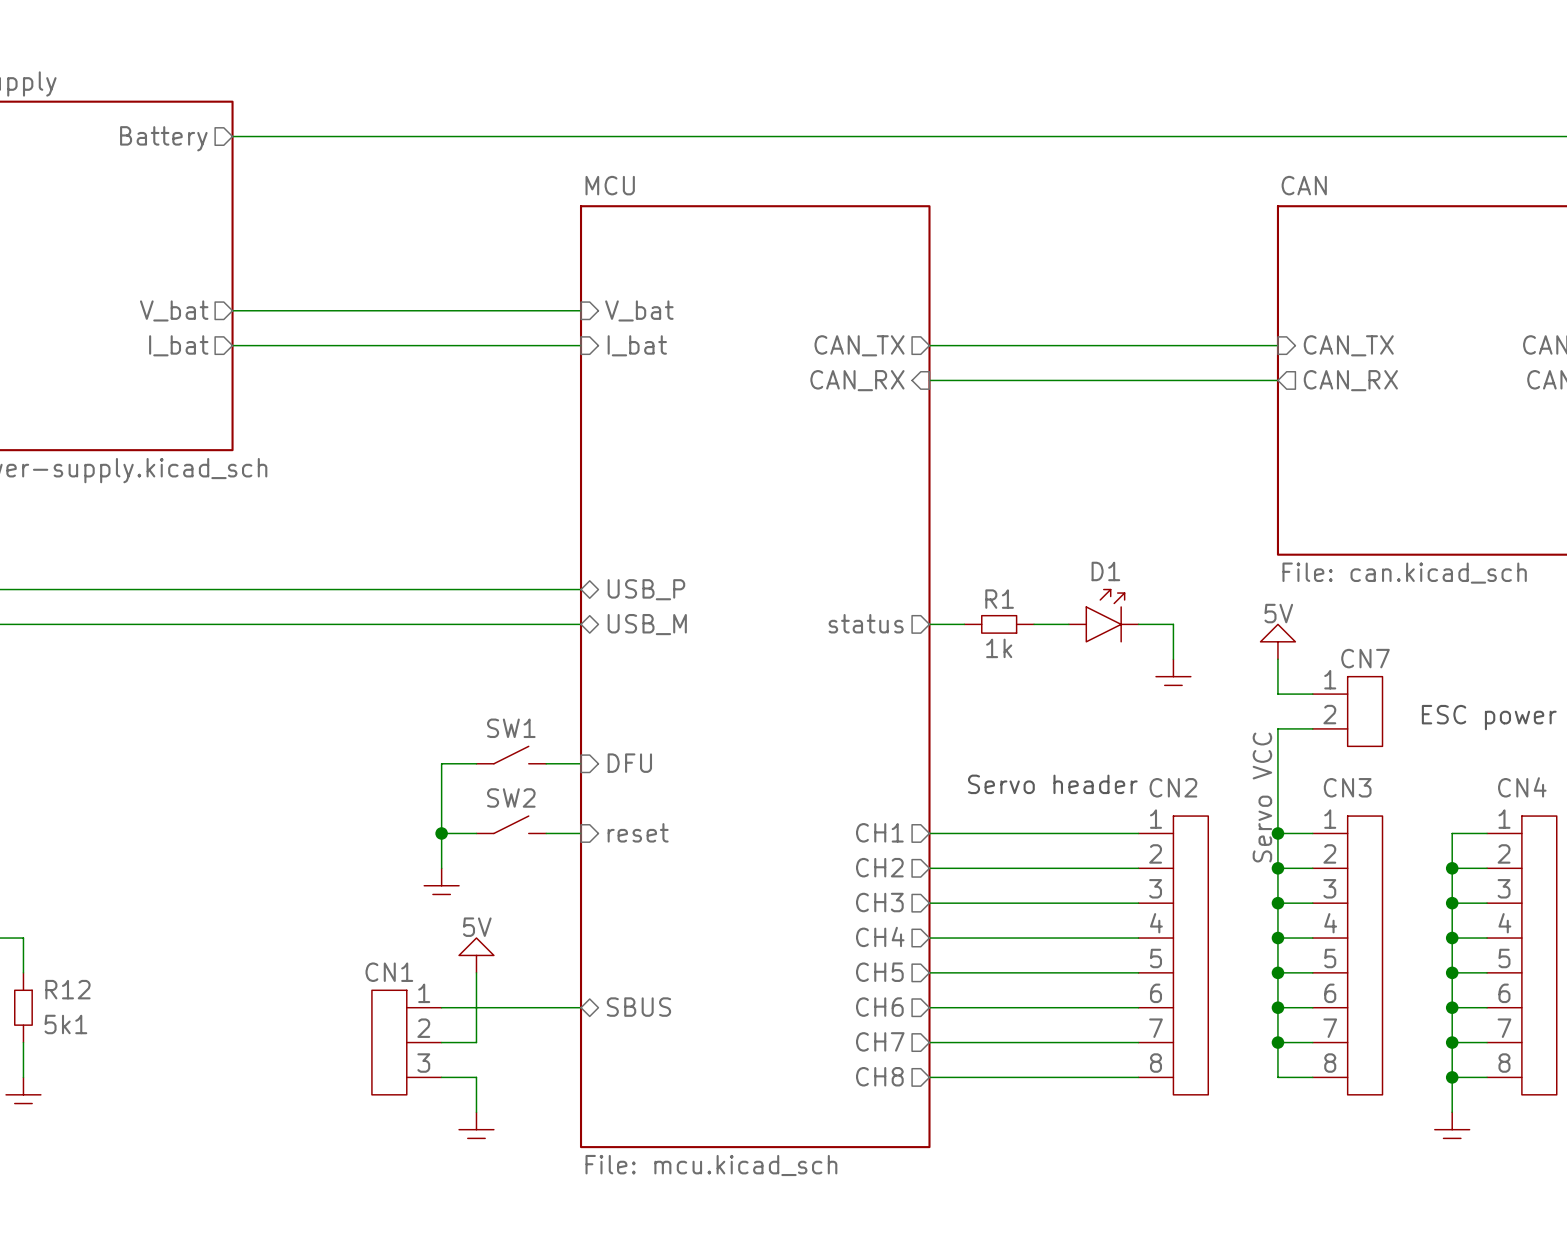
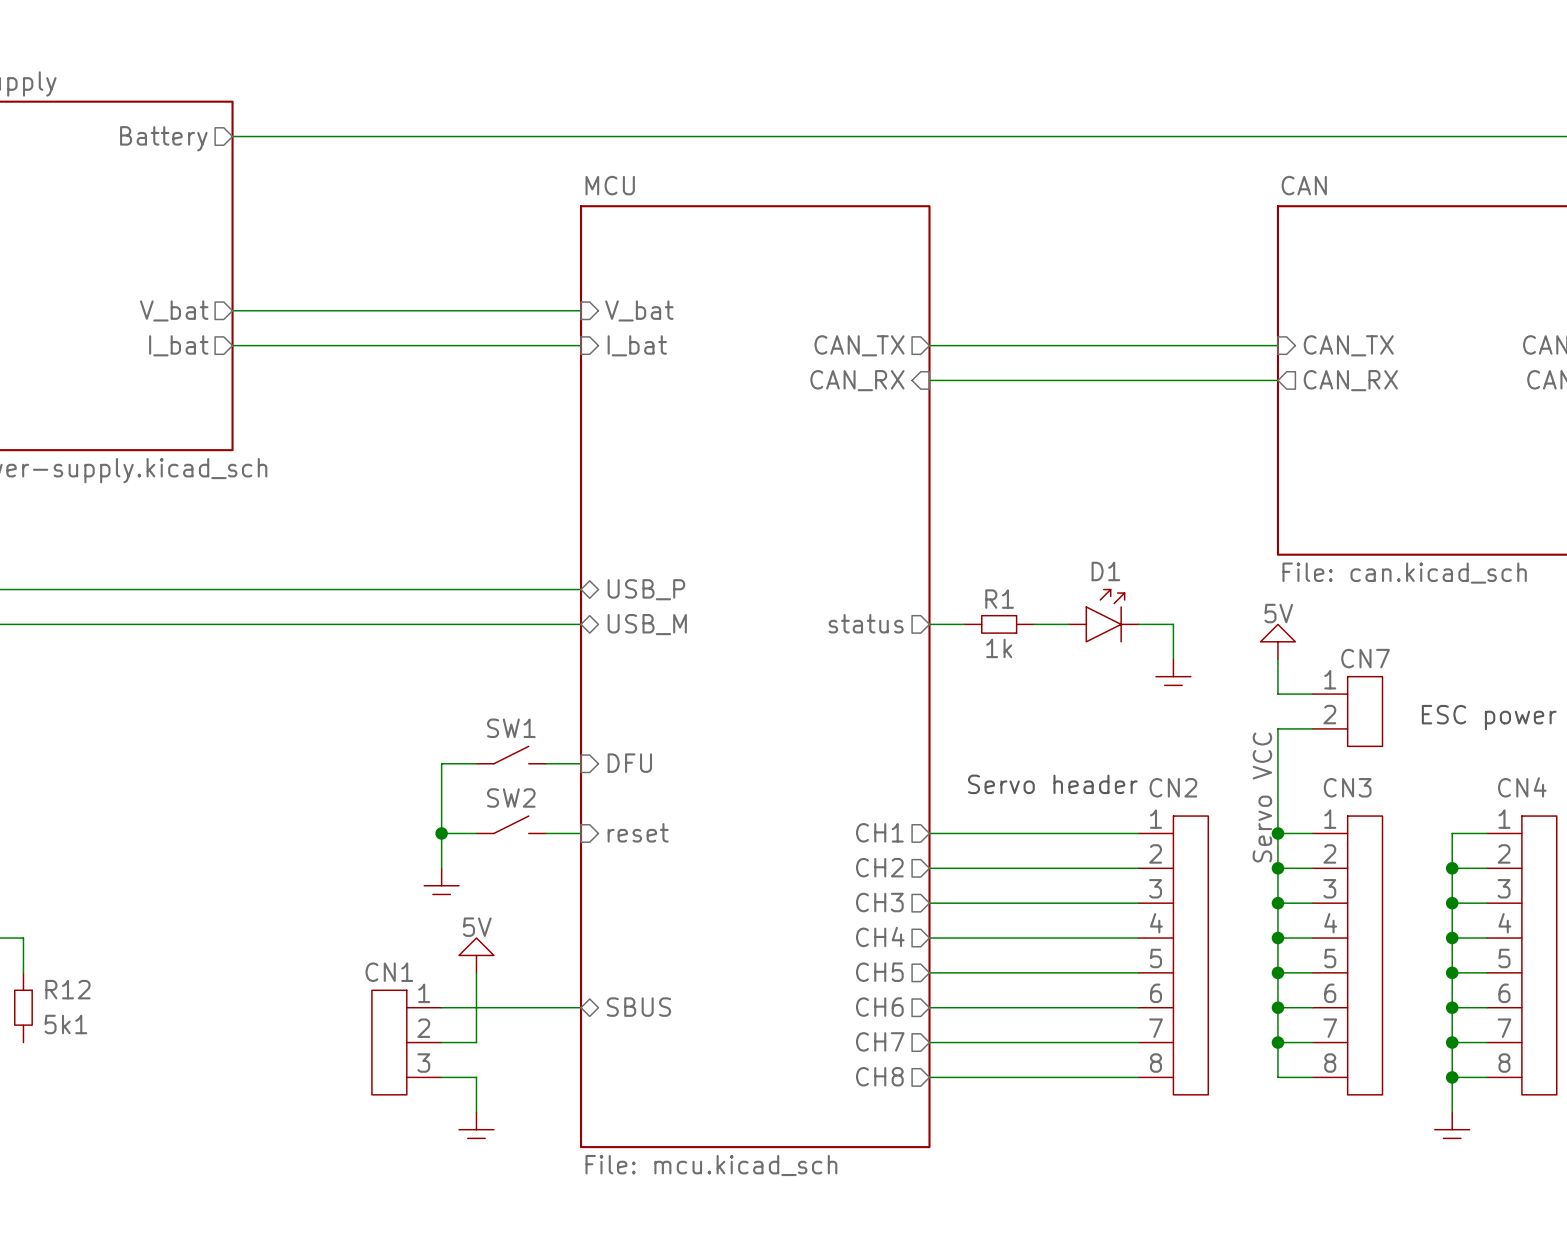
wire: (23, 1042) (23, 1077) -> none
power symbol: (23, 1094) -> none

